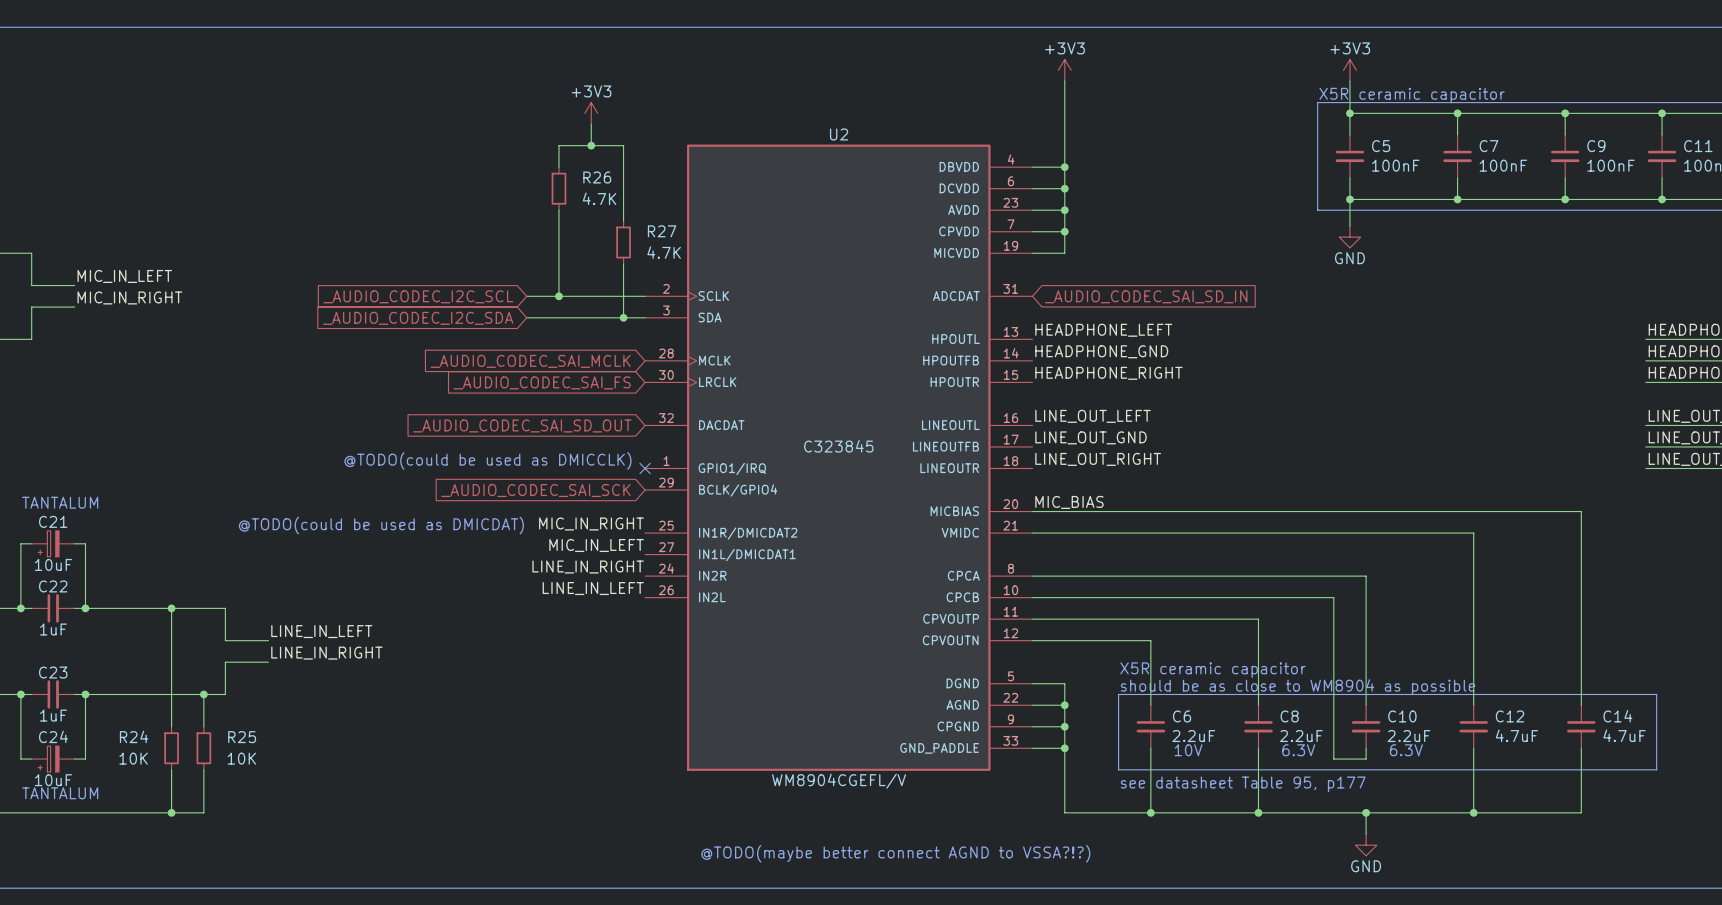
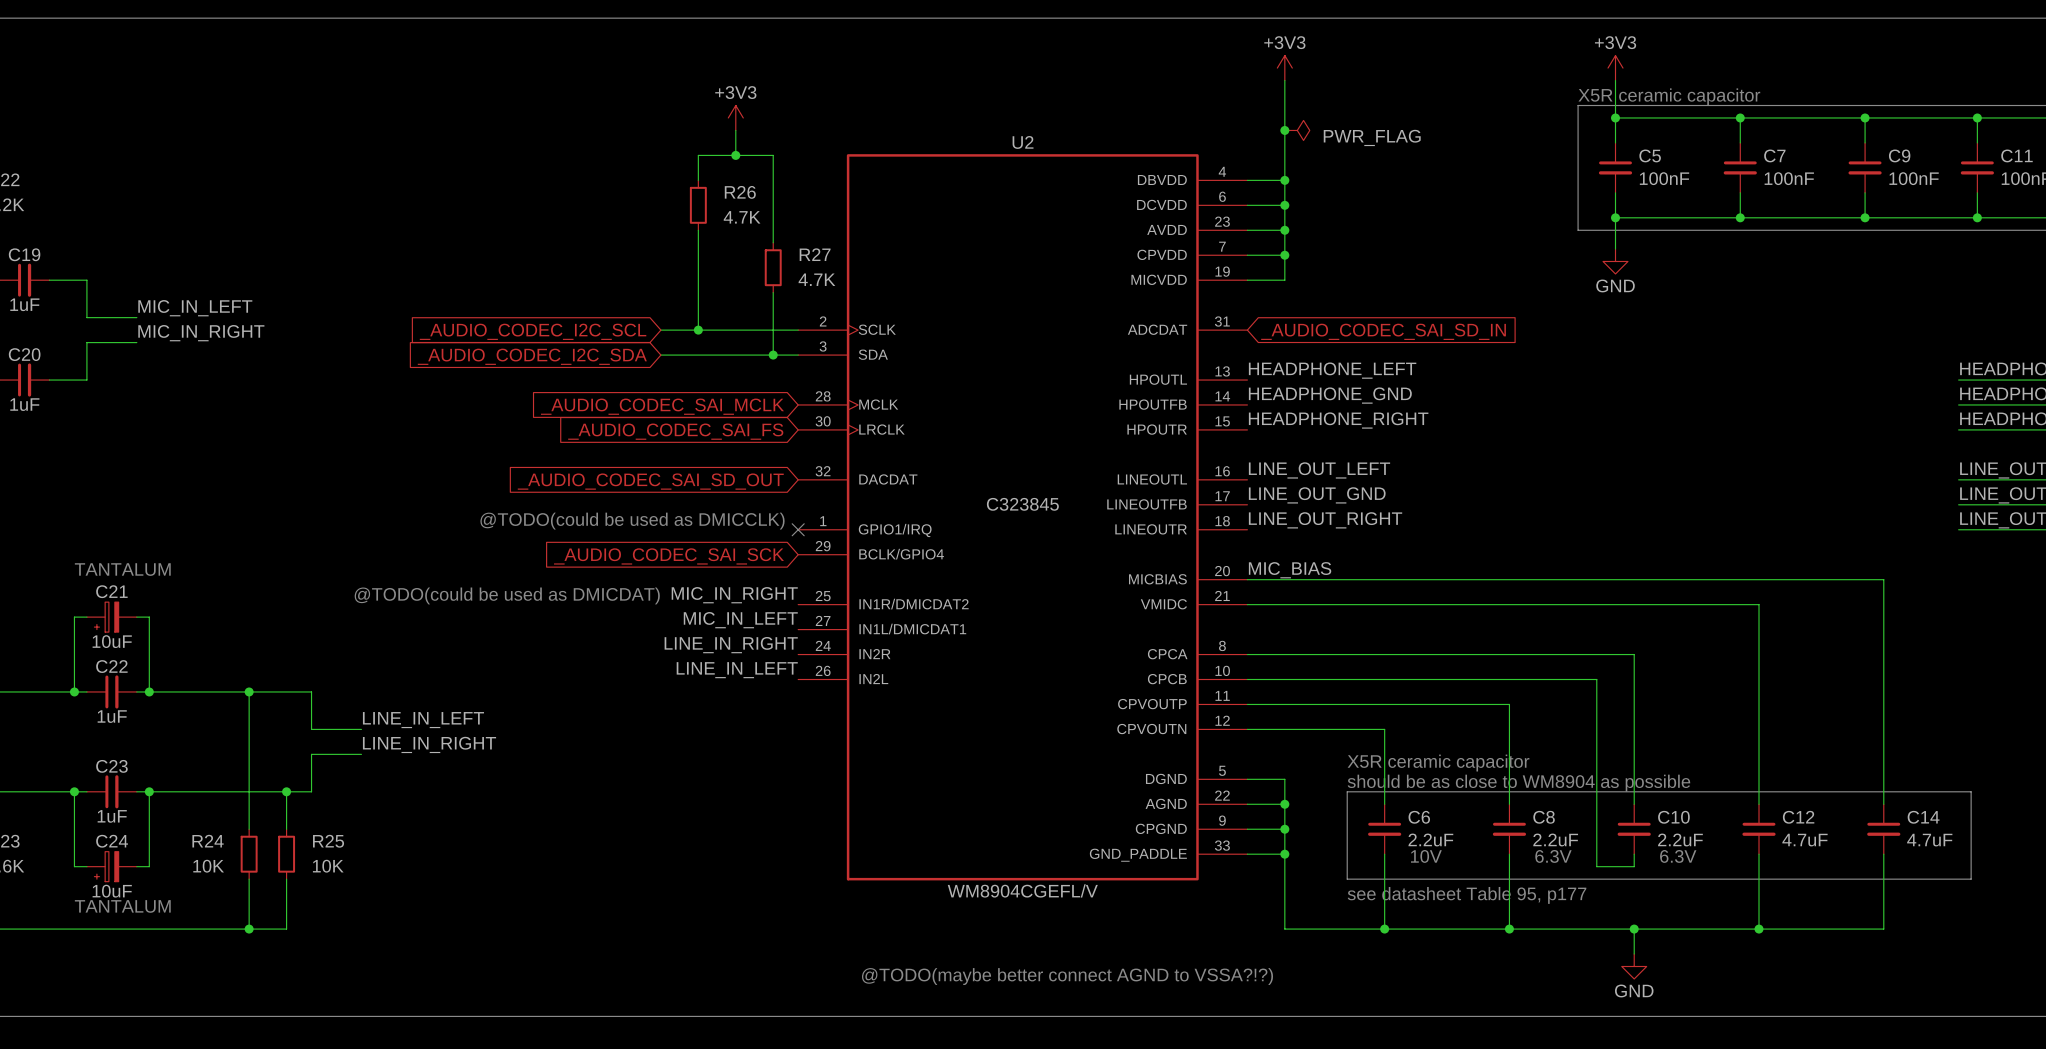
junction: none -> (1284, 130)
power symbol: none -> PWR_FLAG (1297, 130)

